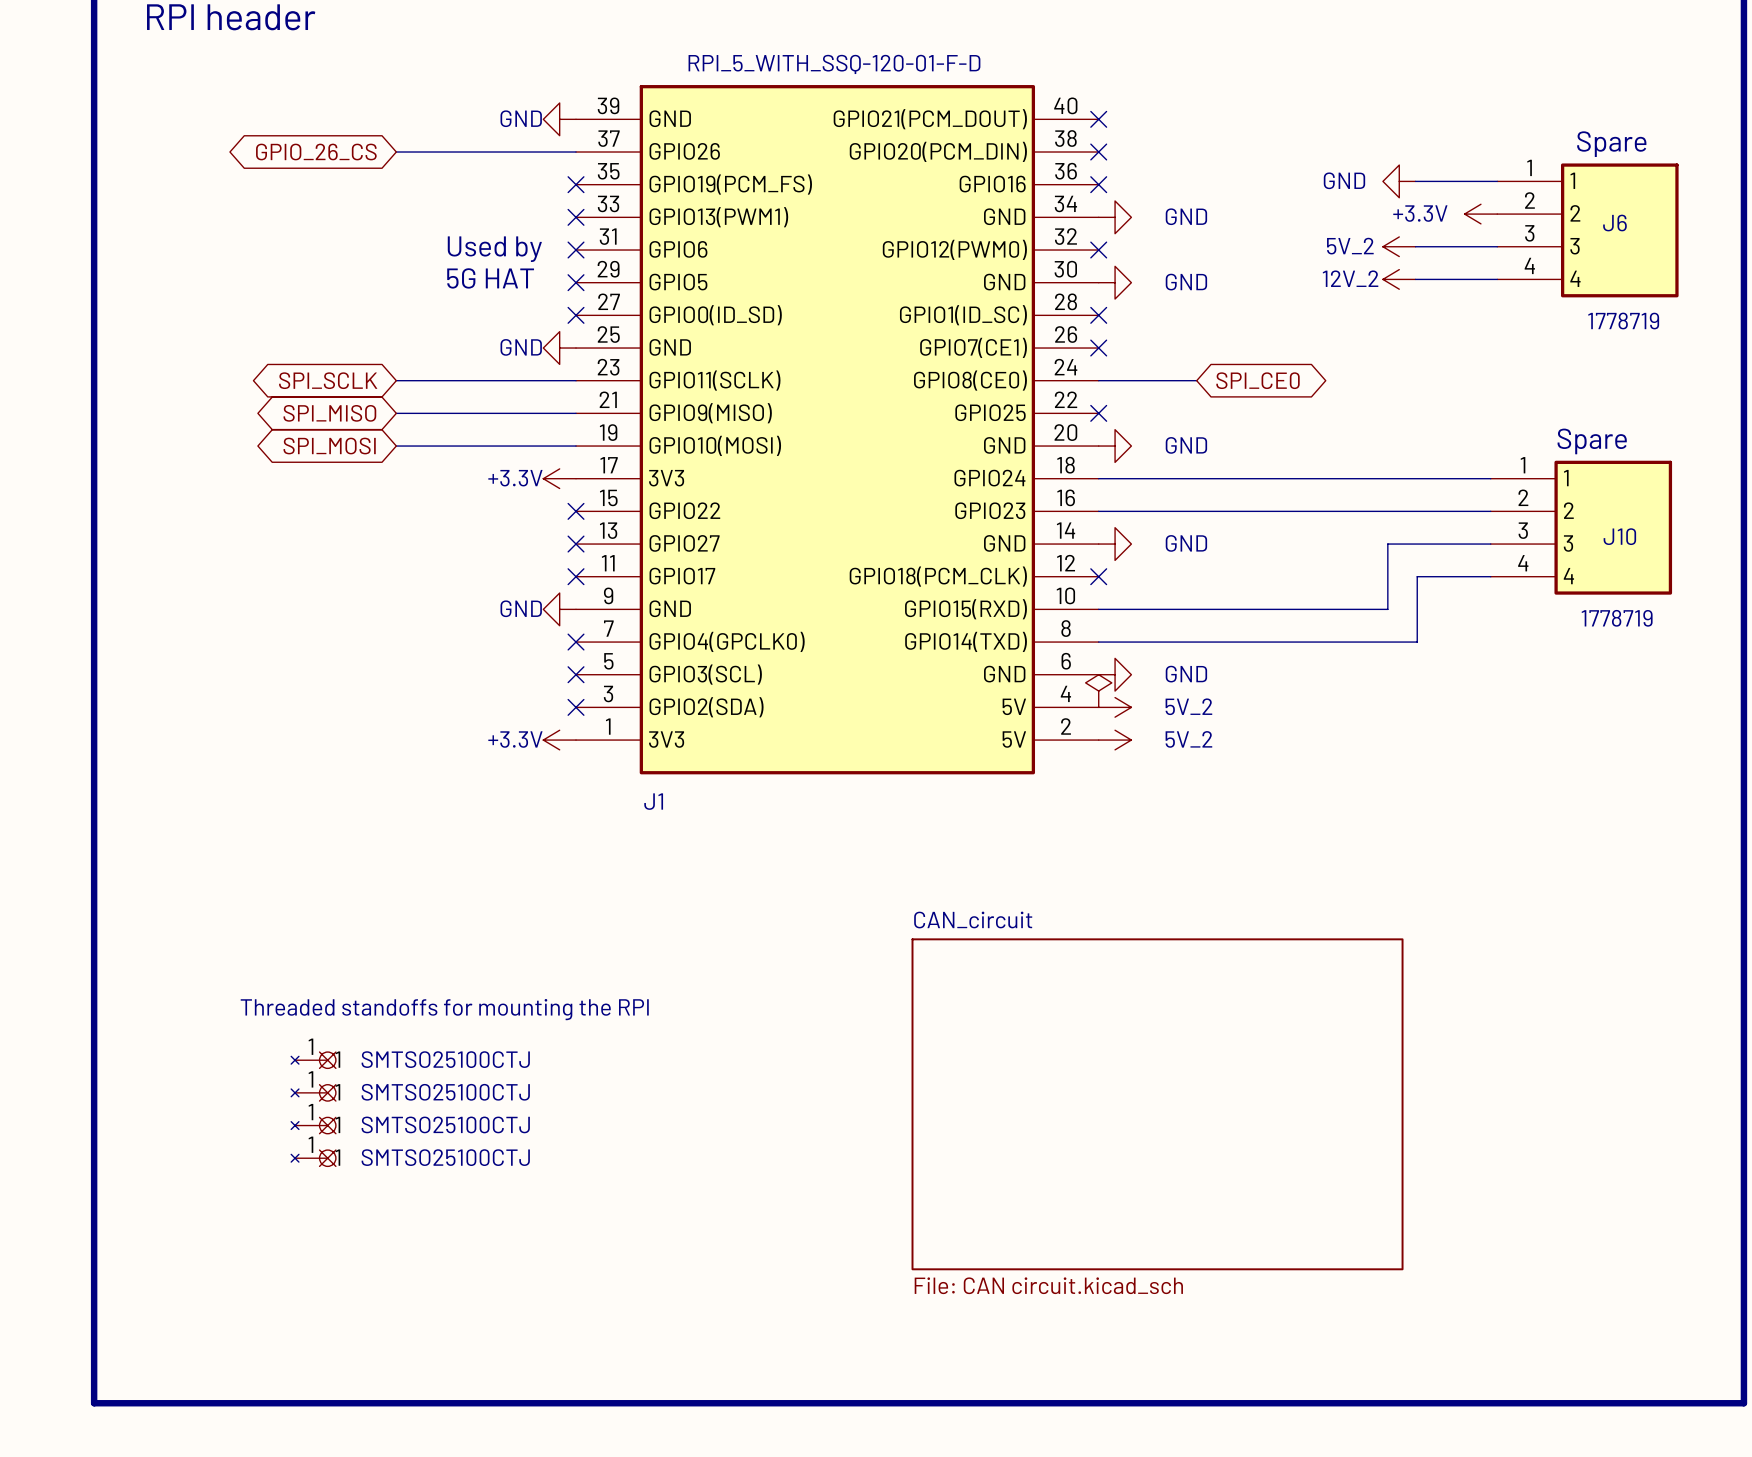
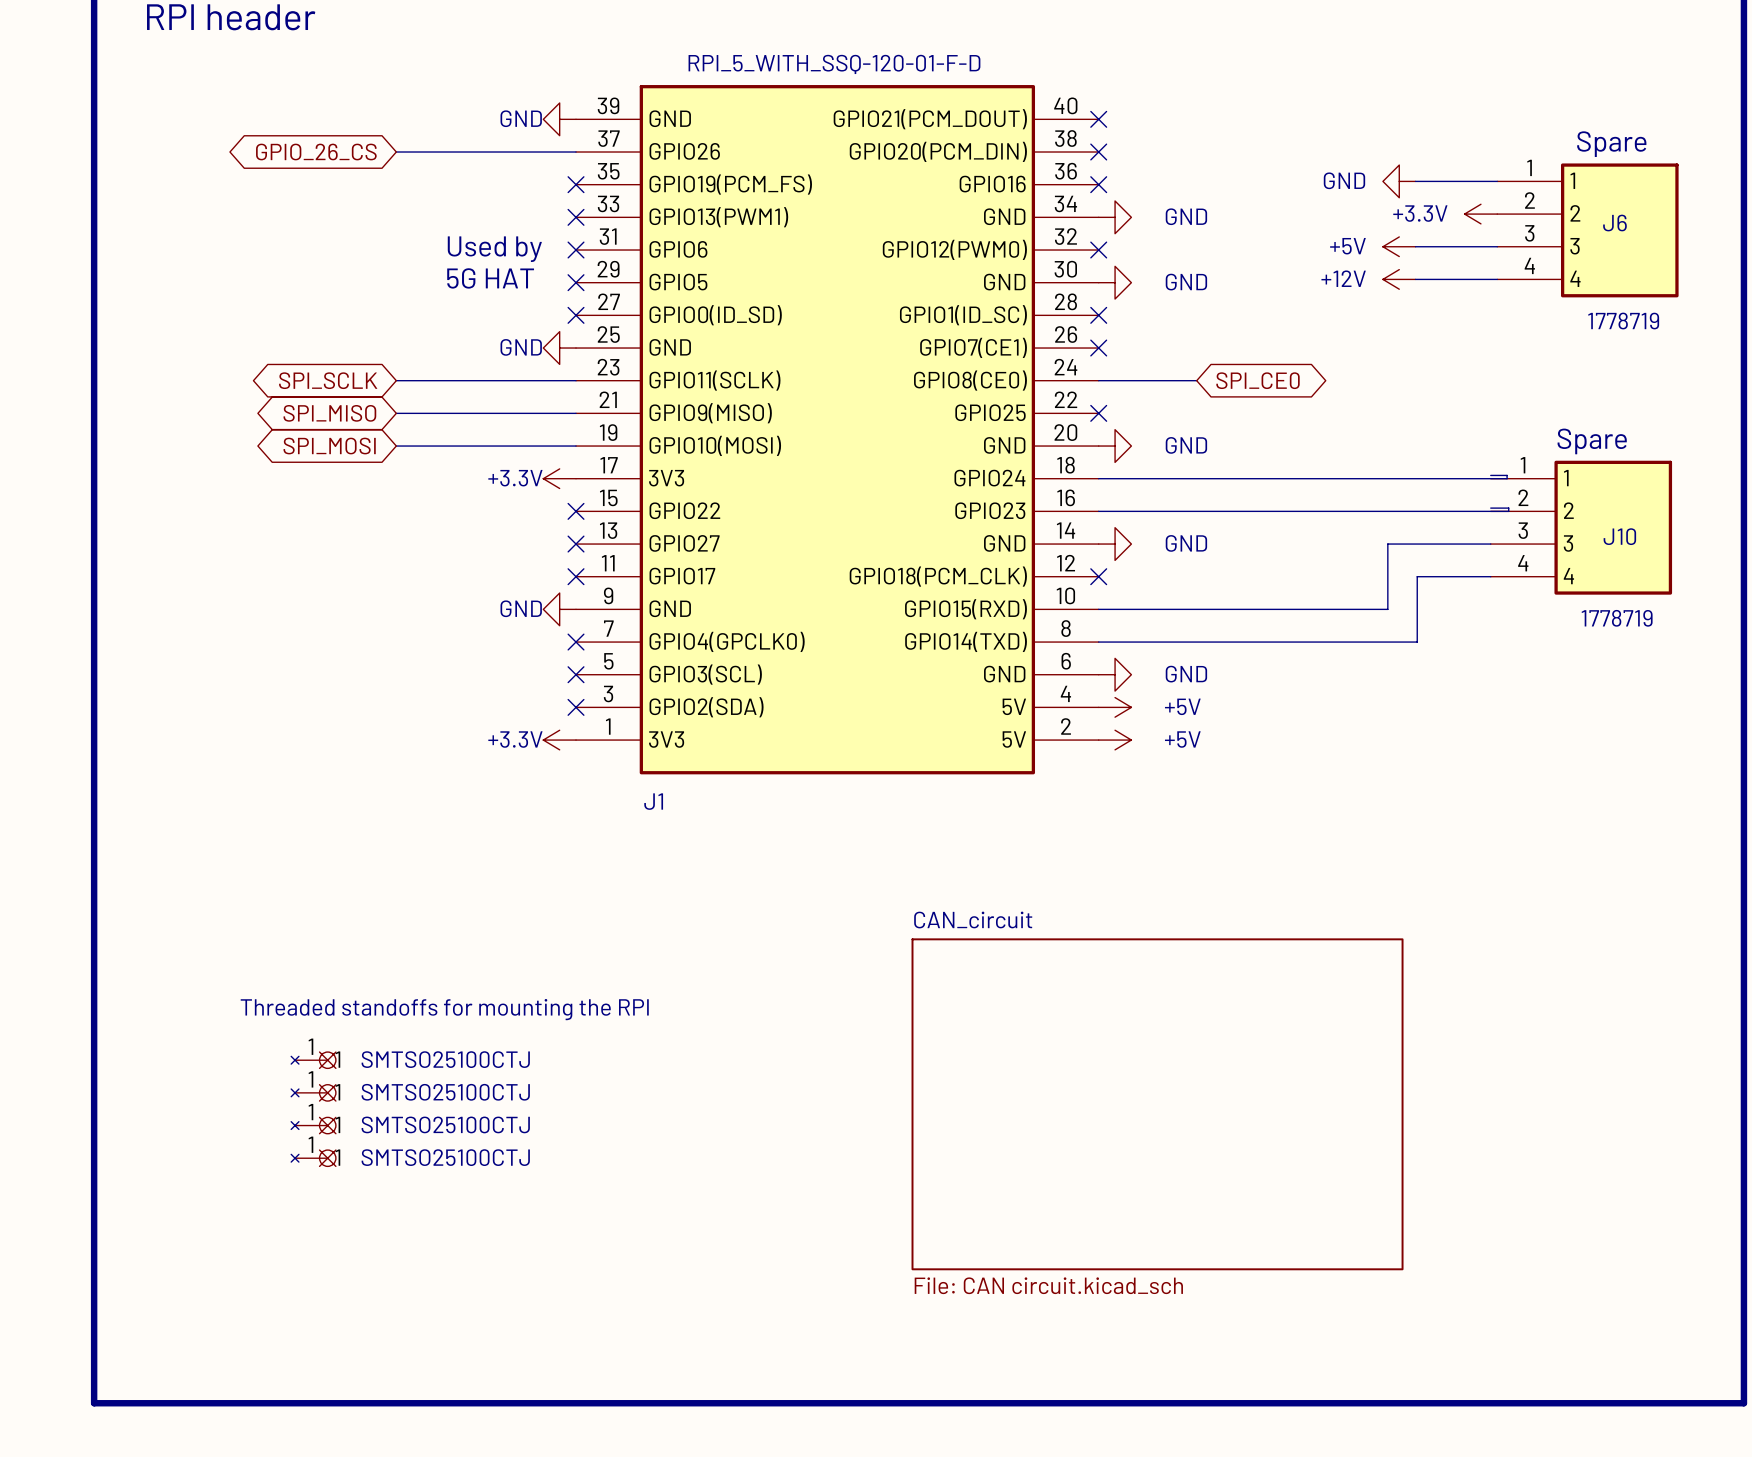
power symbol: 5V_2 (1399, 246) -> +5V (1399, 246)
power symbol: 12V_2 (1399, 279) -> +12V (1399, 279)
wire: none -> (1490, 475) (1507, 475) (1507, 478) (1490, 478)
wire: none -> (1490, 508) (1508, 508) (1508, 511) (1490, 511)
power symbol: (1098, 691) -> none
power symbol: 5V_2 (1115, 707) -> +5V (1115, 707)
power symbol: 5V_2 (1115, 740) -> +5V (1115, 740)

